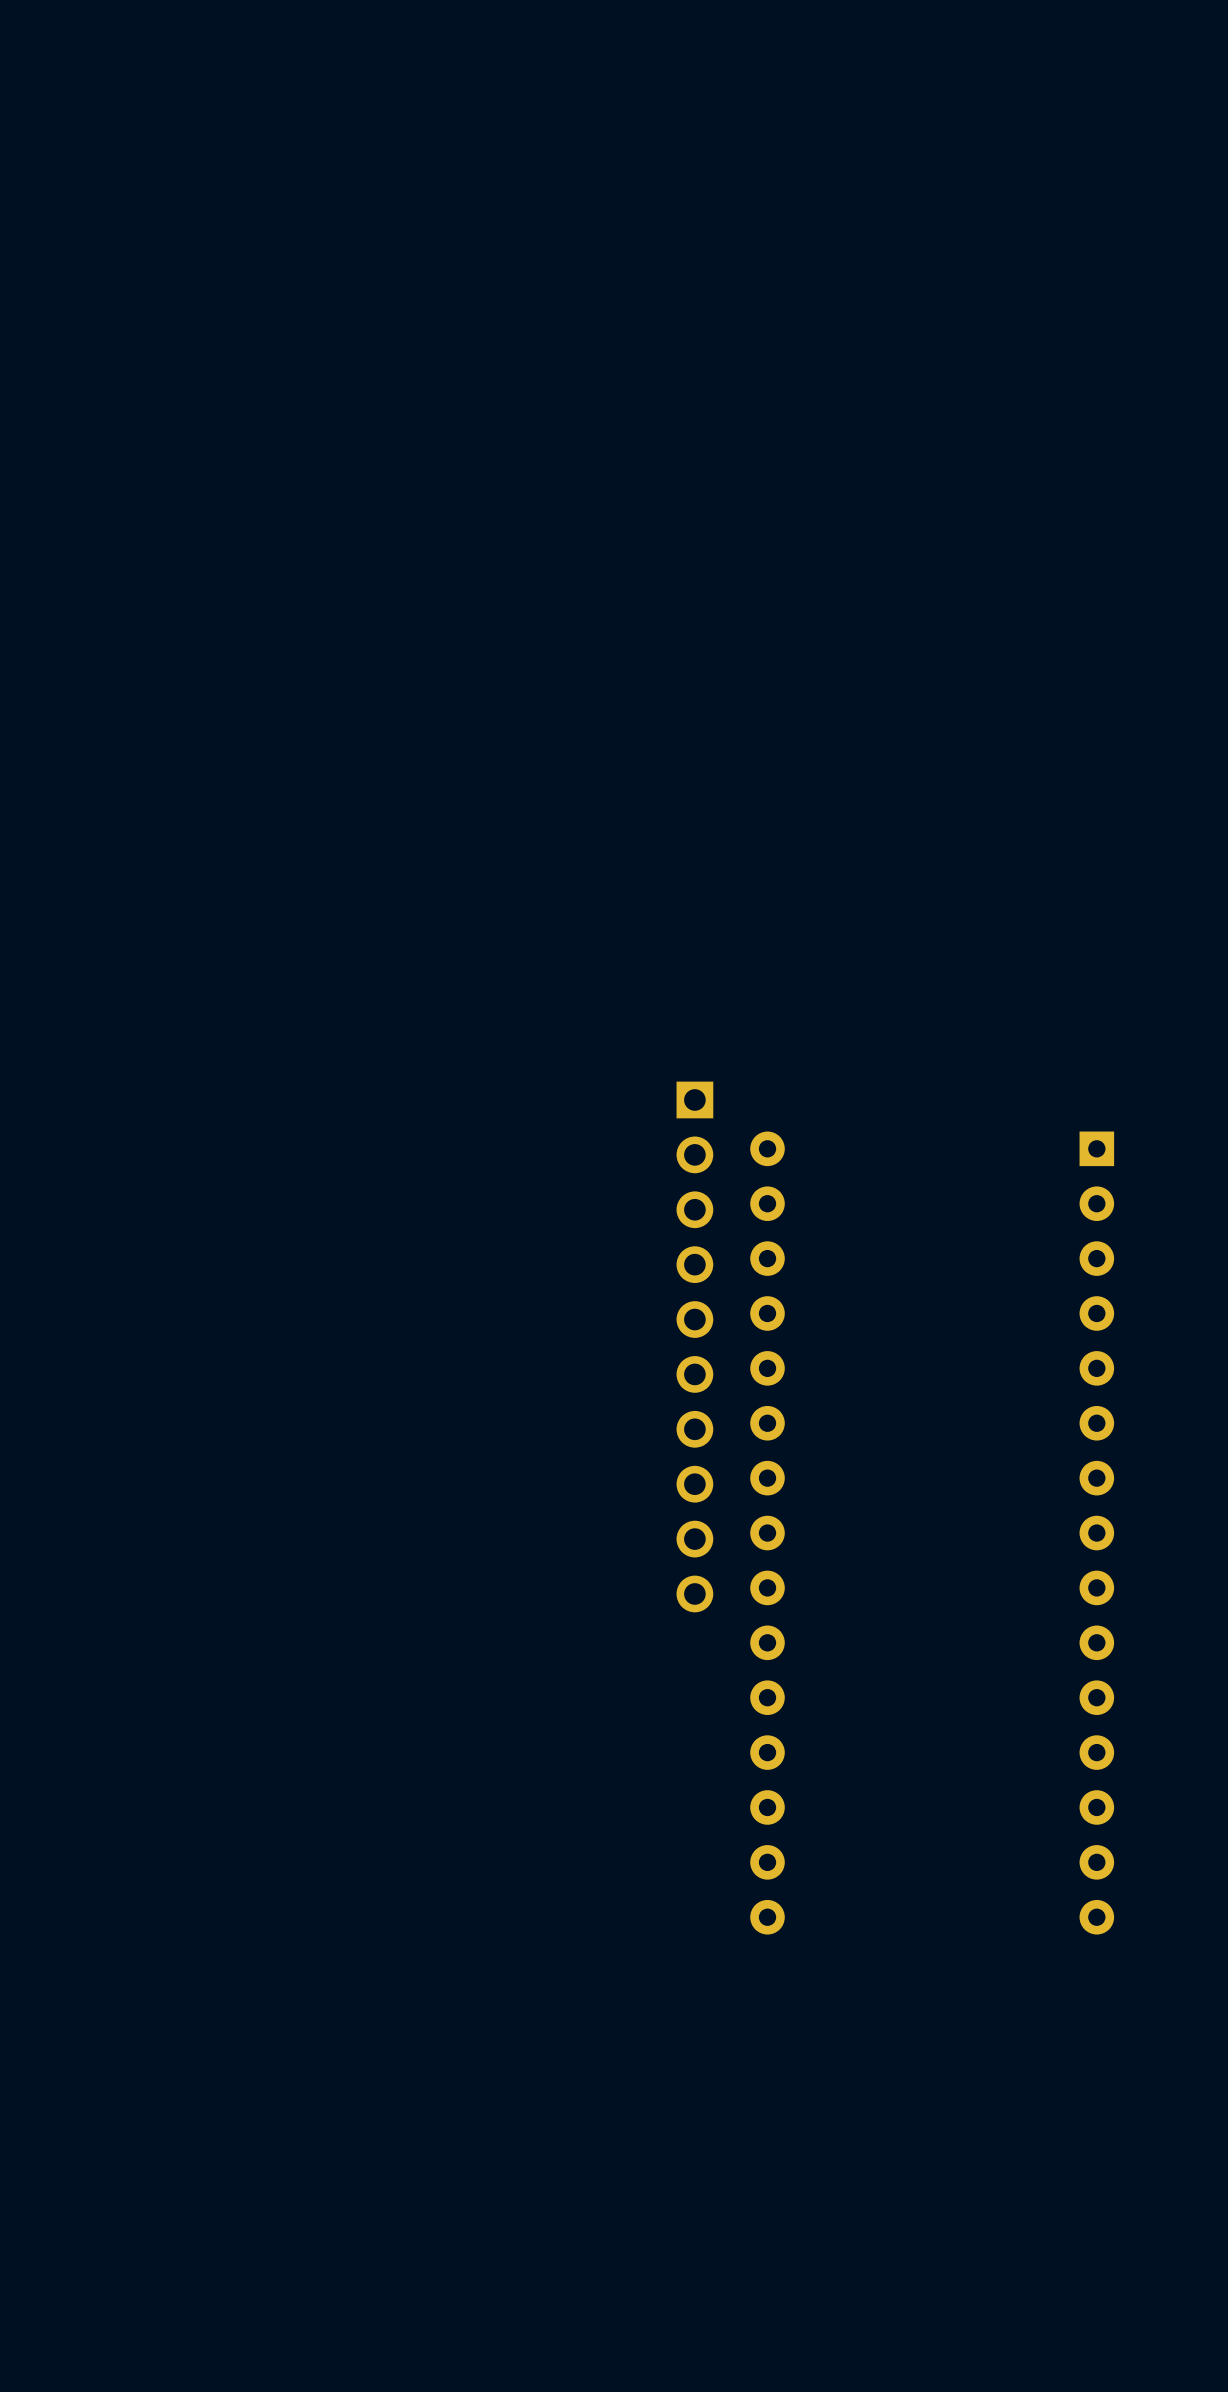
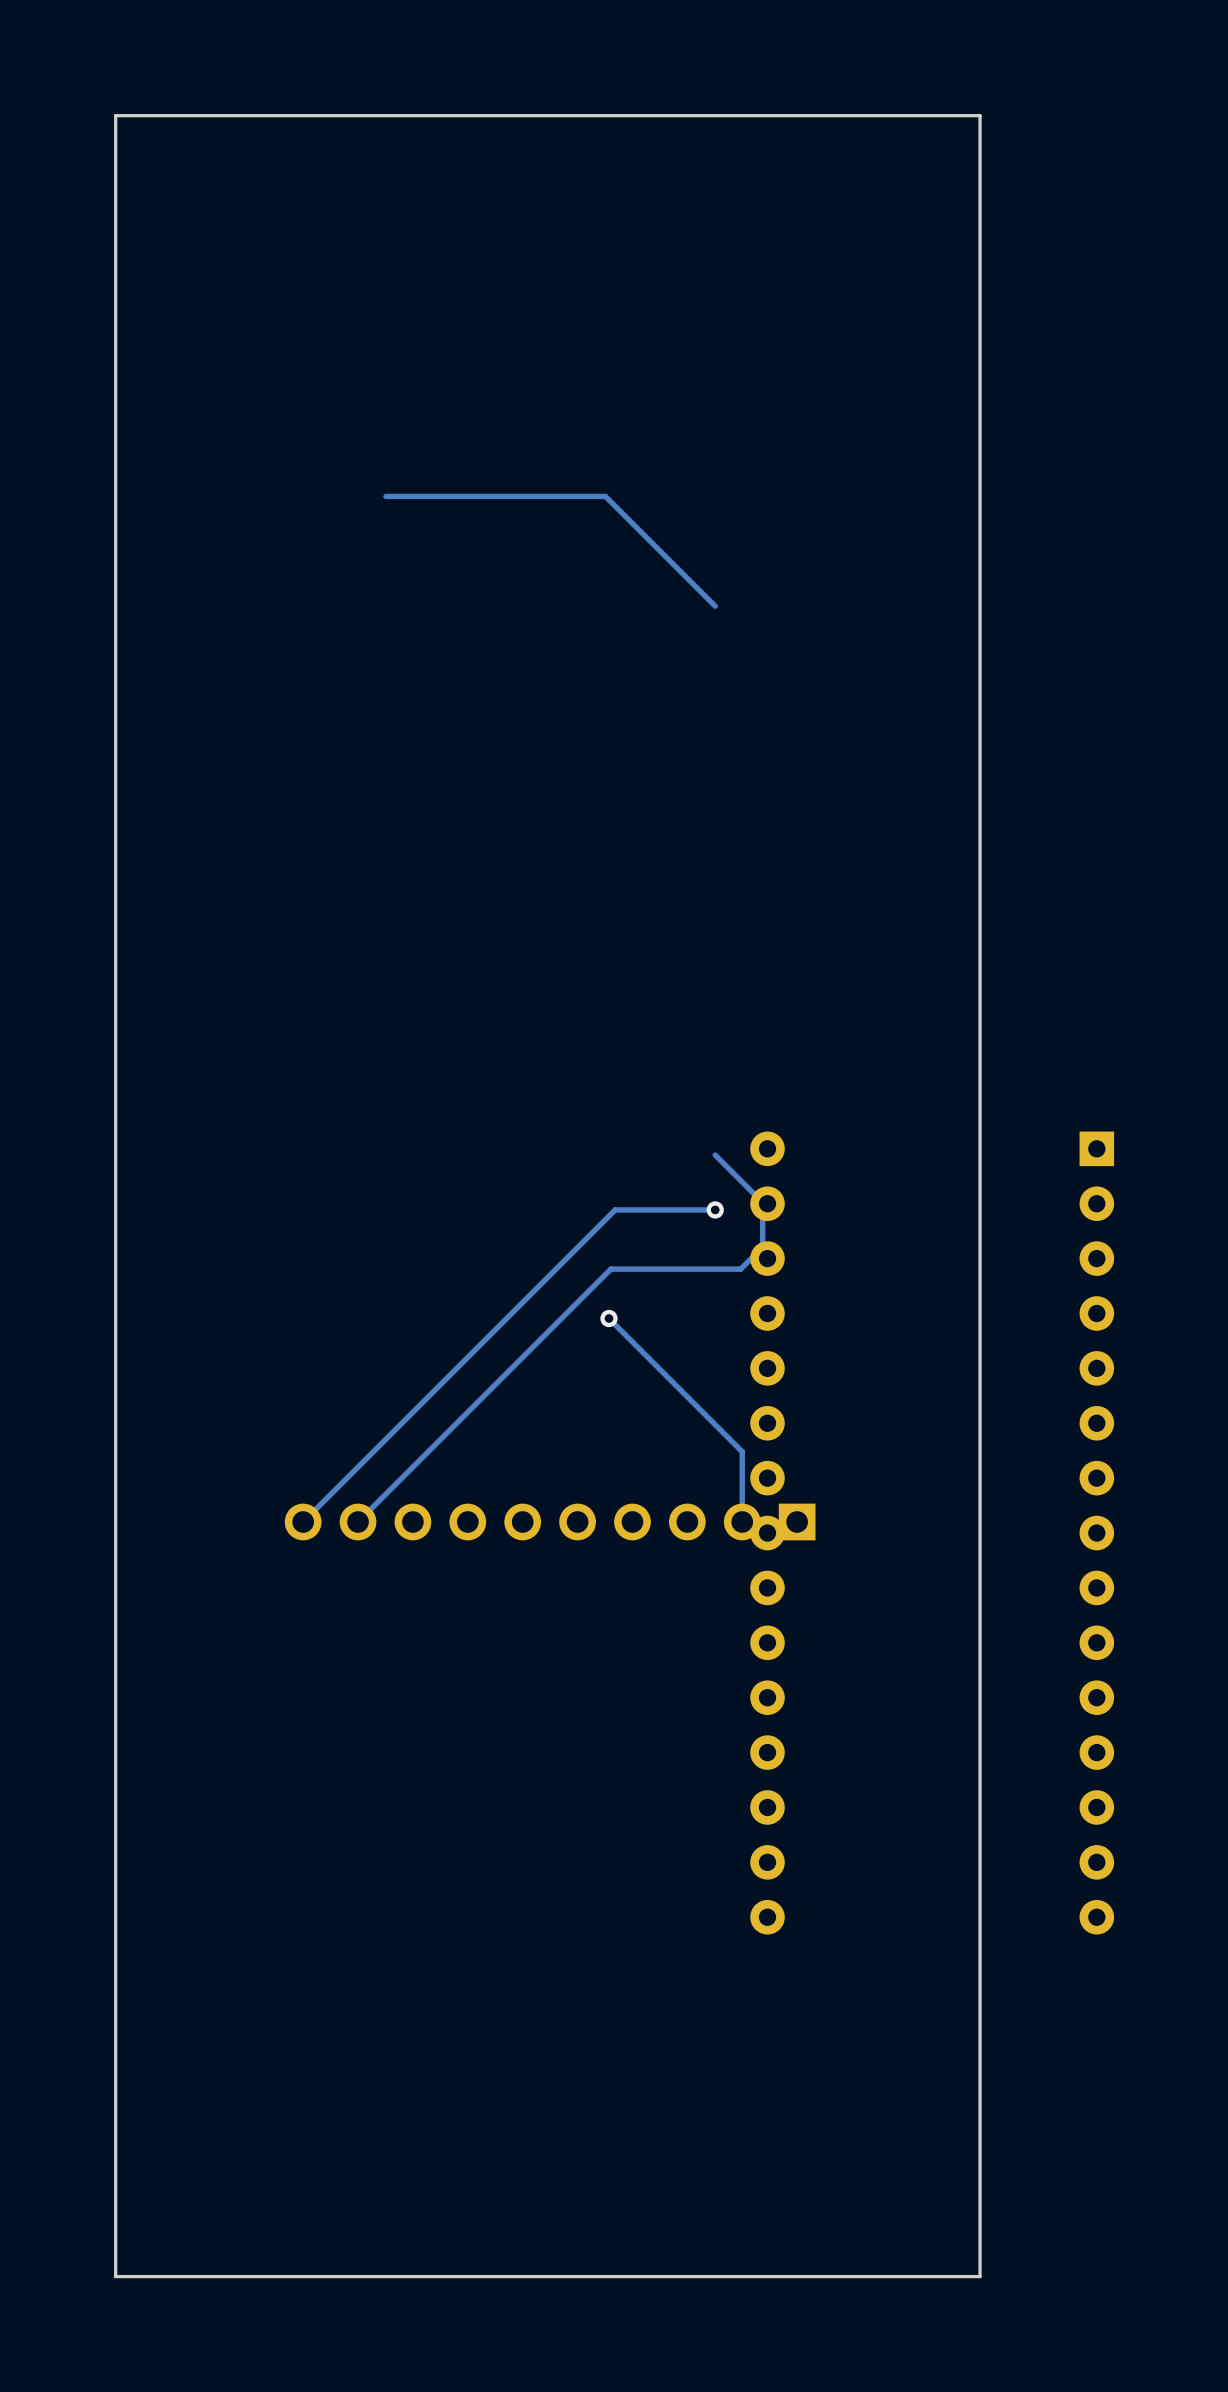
board edge: none -> (980, 115) (115, 115) (115, 2276) (980, 2276) (980, 115)
track: none -> (385, 496) (605, 496) (715, 606)
track: none -> (715, 1155) (762, 1202) (762, 1247) (740, 1269) (610, 1269) (358, 1521)
track: none -> (715, 1209) (615, 1209) (303, 1521)
via: none -> (715, 1209)
track: none -> (609, 1318) (742, 1451) (742, 1521)
via: none -> (609, 1318)
part rotation: 0° (694, 1346) -> 90° clockwise (550, 1521)

